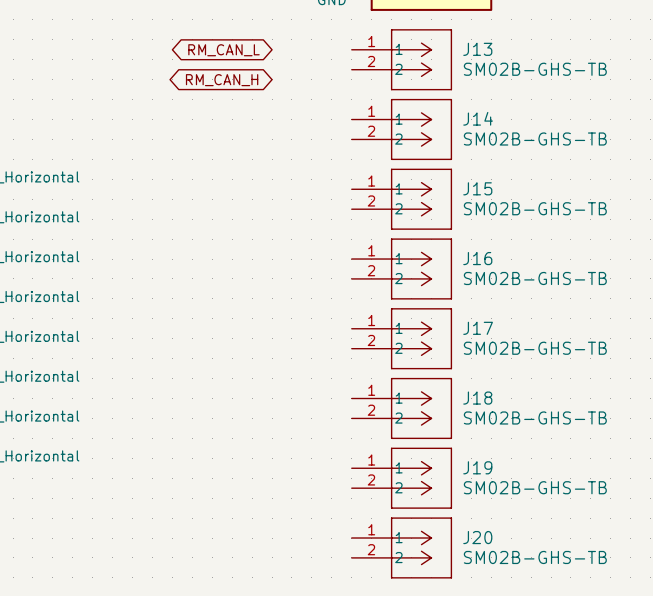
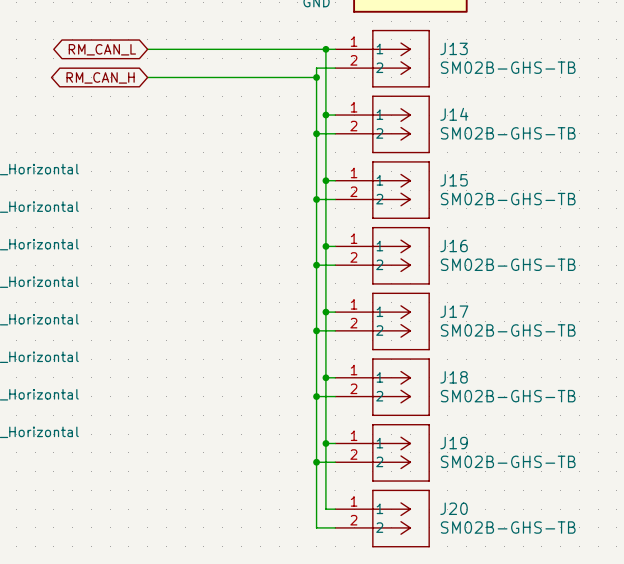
wire: none -> (147, 49) (335, 49)
wire: none -> (325, 49) (325, 509) (335, 509)
junction: none -> (325, 49)
global label position: RM_CAN_L (224, 50) -> RM_CAN_L (102, 49)
wire: none -> (335, 68) (316, 68) (316, 527) (335, 527)
wire: none -> (147, 77) (316, 77)
junction: none -> (316, 77)
global label position: RM_CAN_H (222, 80) -> RM_CAN_H (100, 77)
wire: none -> (325, 115) (335, 115)
junction: none -> (325, 115)
wire: none -> (316, 133) (335, 133)
junction: none -> (316, 133)
wire: none -> (325, 180) (335, 180)
junction: none -> (325, 180)
wire: none -> (316, 199) (335, 199)
junction: none -> (316, 199)
wire: none -> (325, 246) (335, 246)
junction: none -> (325, 246)
wire: none -> (316, 265) (335, 265)
junction: none -> (316, 265)
wire: none -> (325, 312) (335, 312)
junction: none -> (325, 312)
wire: none -> (316, 330) (335, 330)
junction: none -> (316, 330)
wire: none -> (325, 377) (335, 377)
junction: none -> (325, 377)
wire: none -> (316, 396) (335, 396)
junction: none -> (316, 396)
wire: none -> (325, 443) (335, 443)
junction: none -> (325, 443)
wire: none -> (316, 462) (335, 462)
junction: none -> (316, 462)

